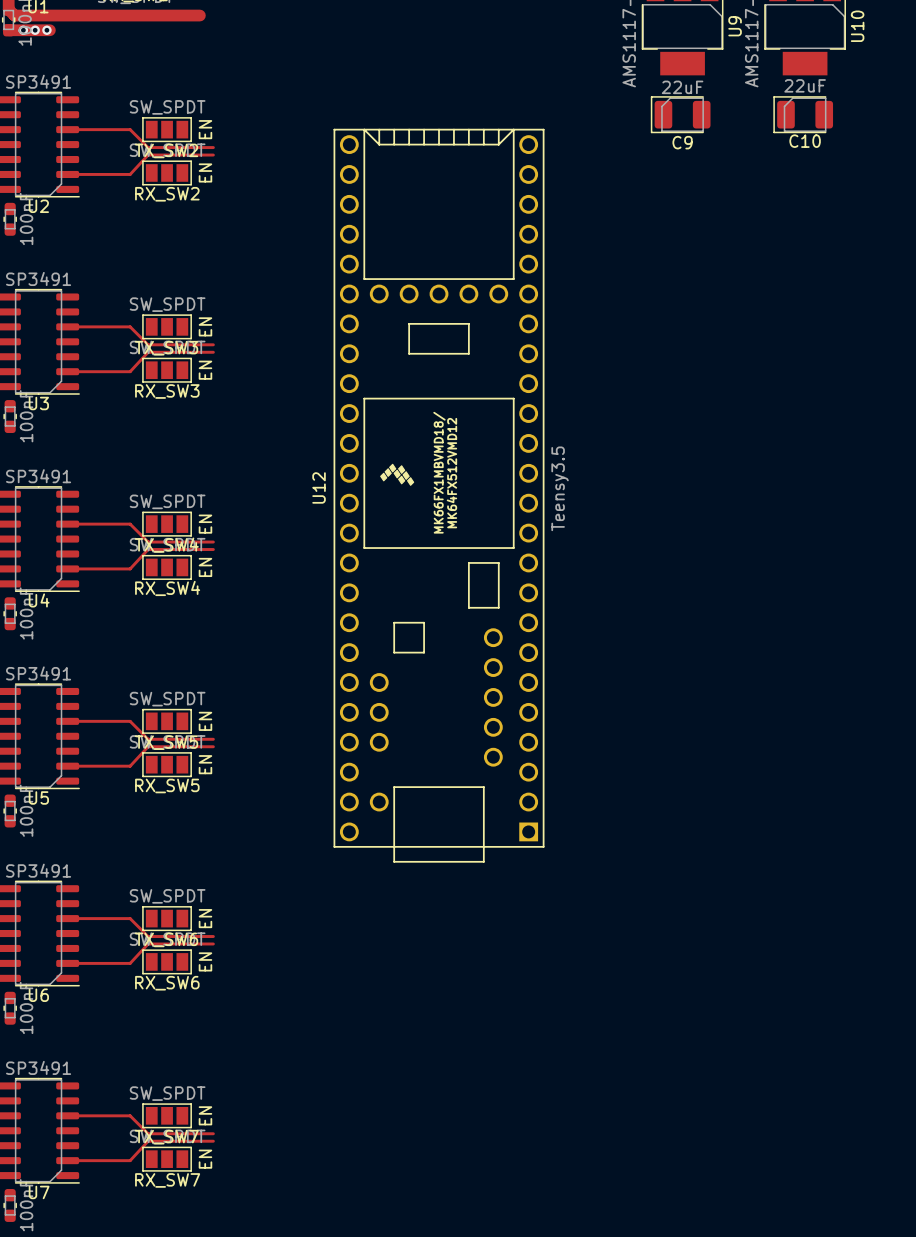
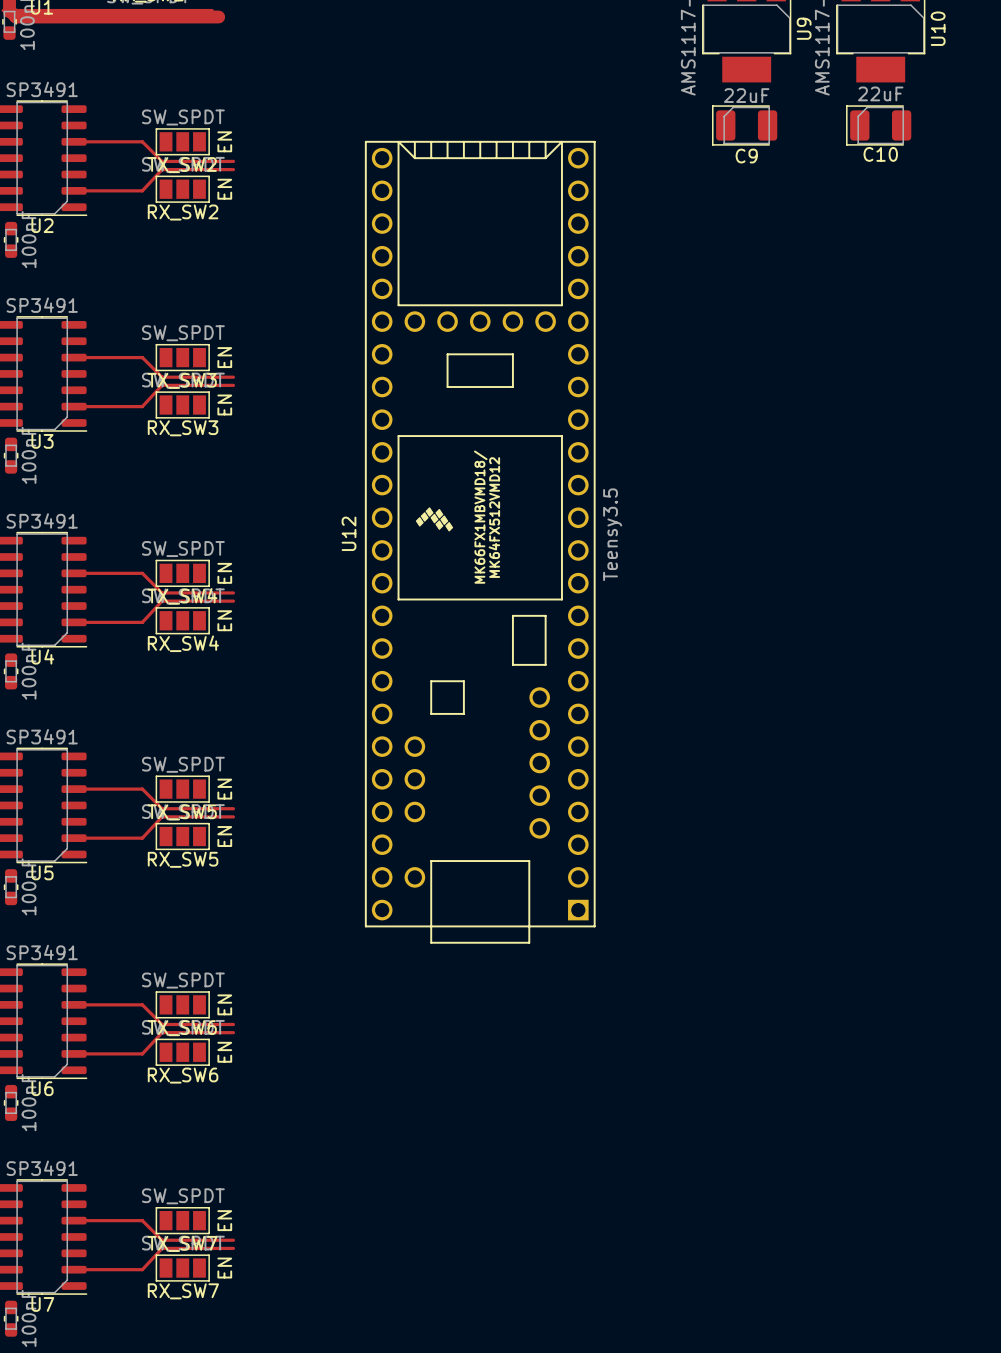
top track: none -> (3, 10) (212, 10)
top track: (8, 30) (49, 30) -> none
via: (23, 30) -> none
via: (35, 30) -> none
via: (46, 30) -> none

